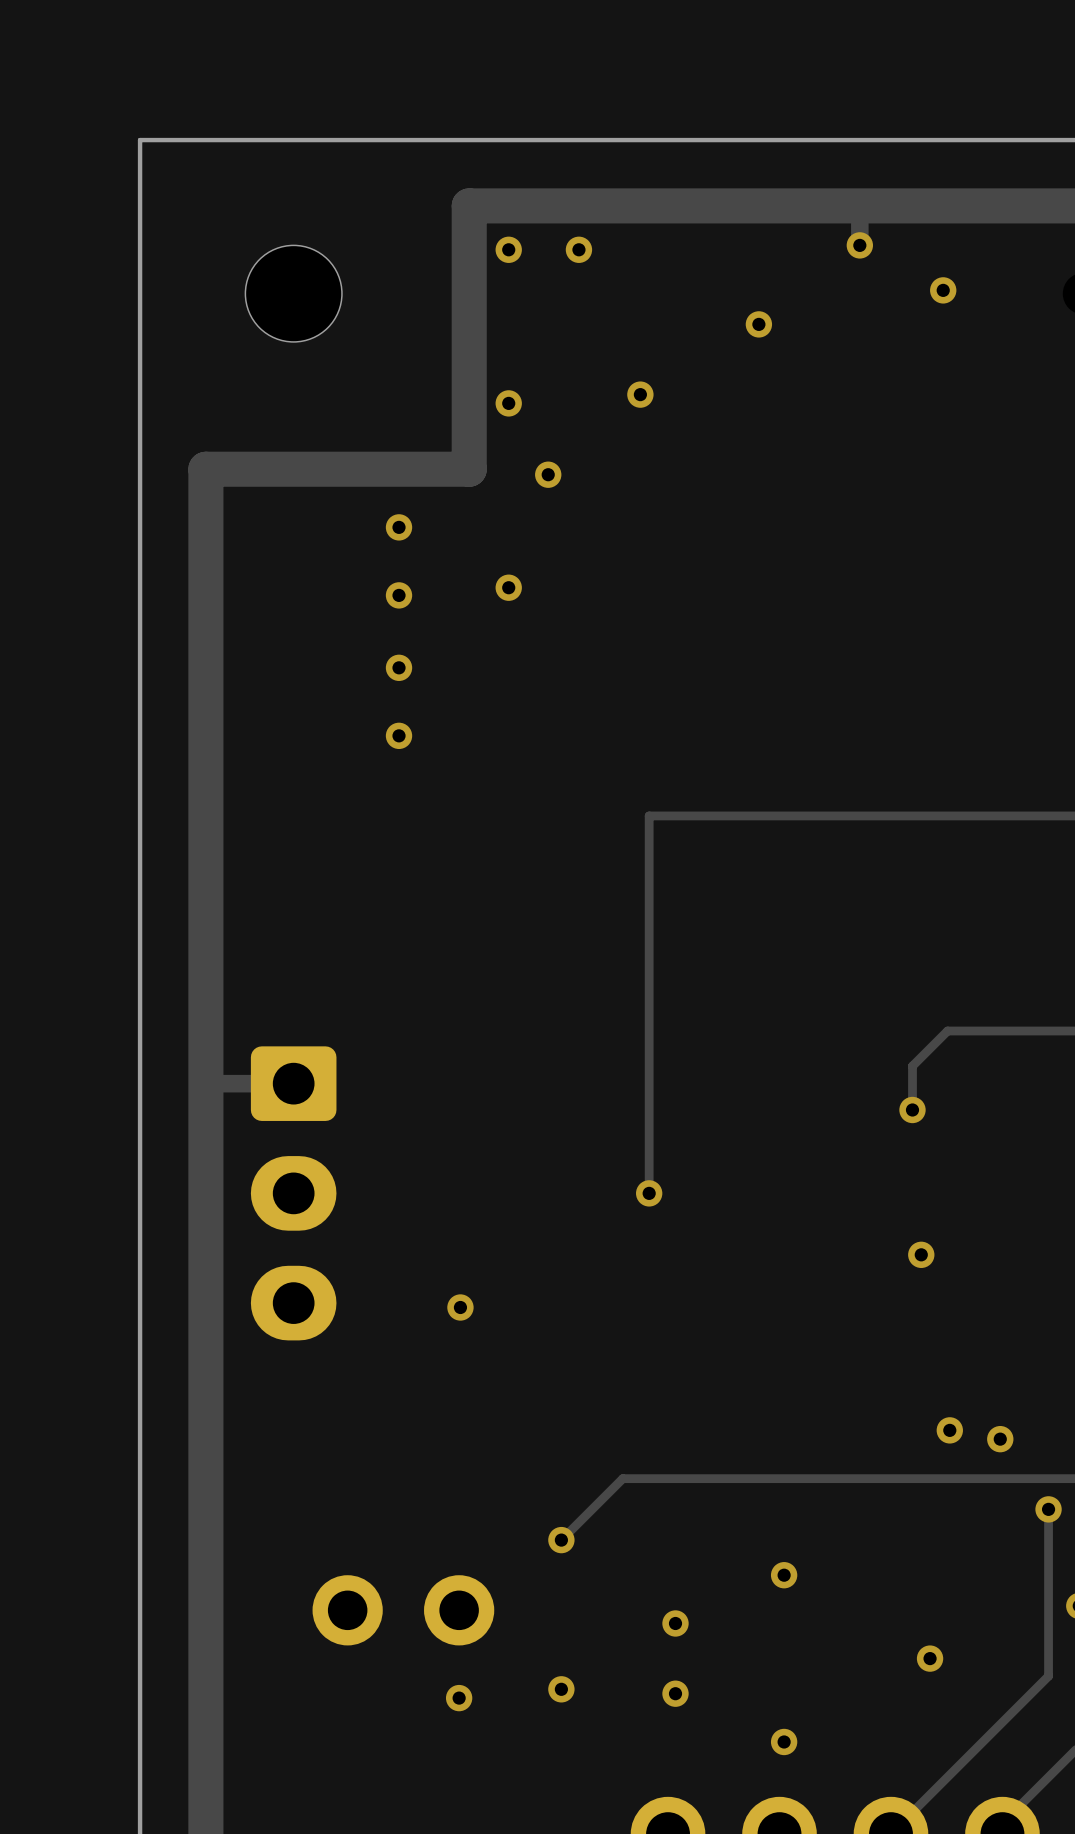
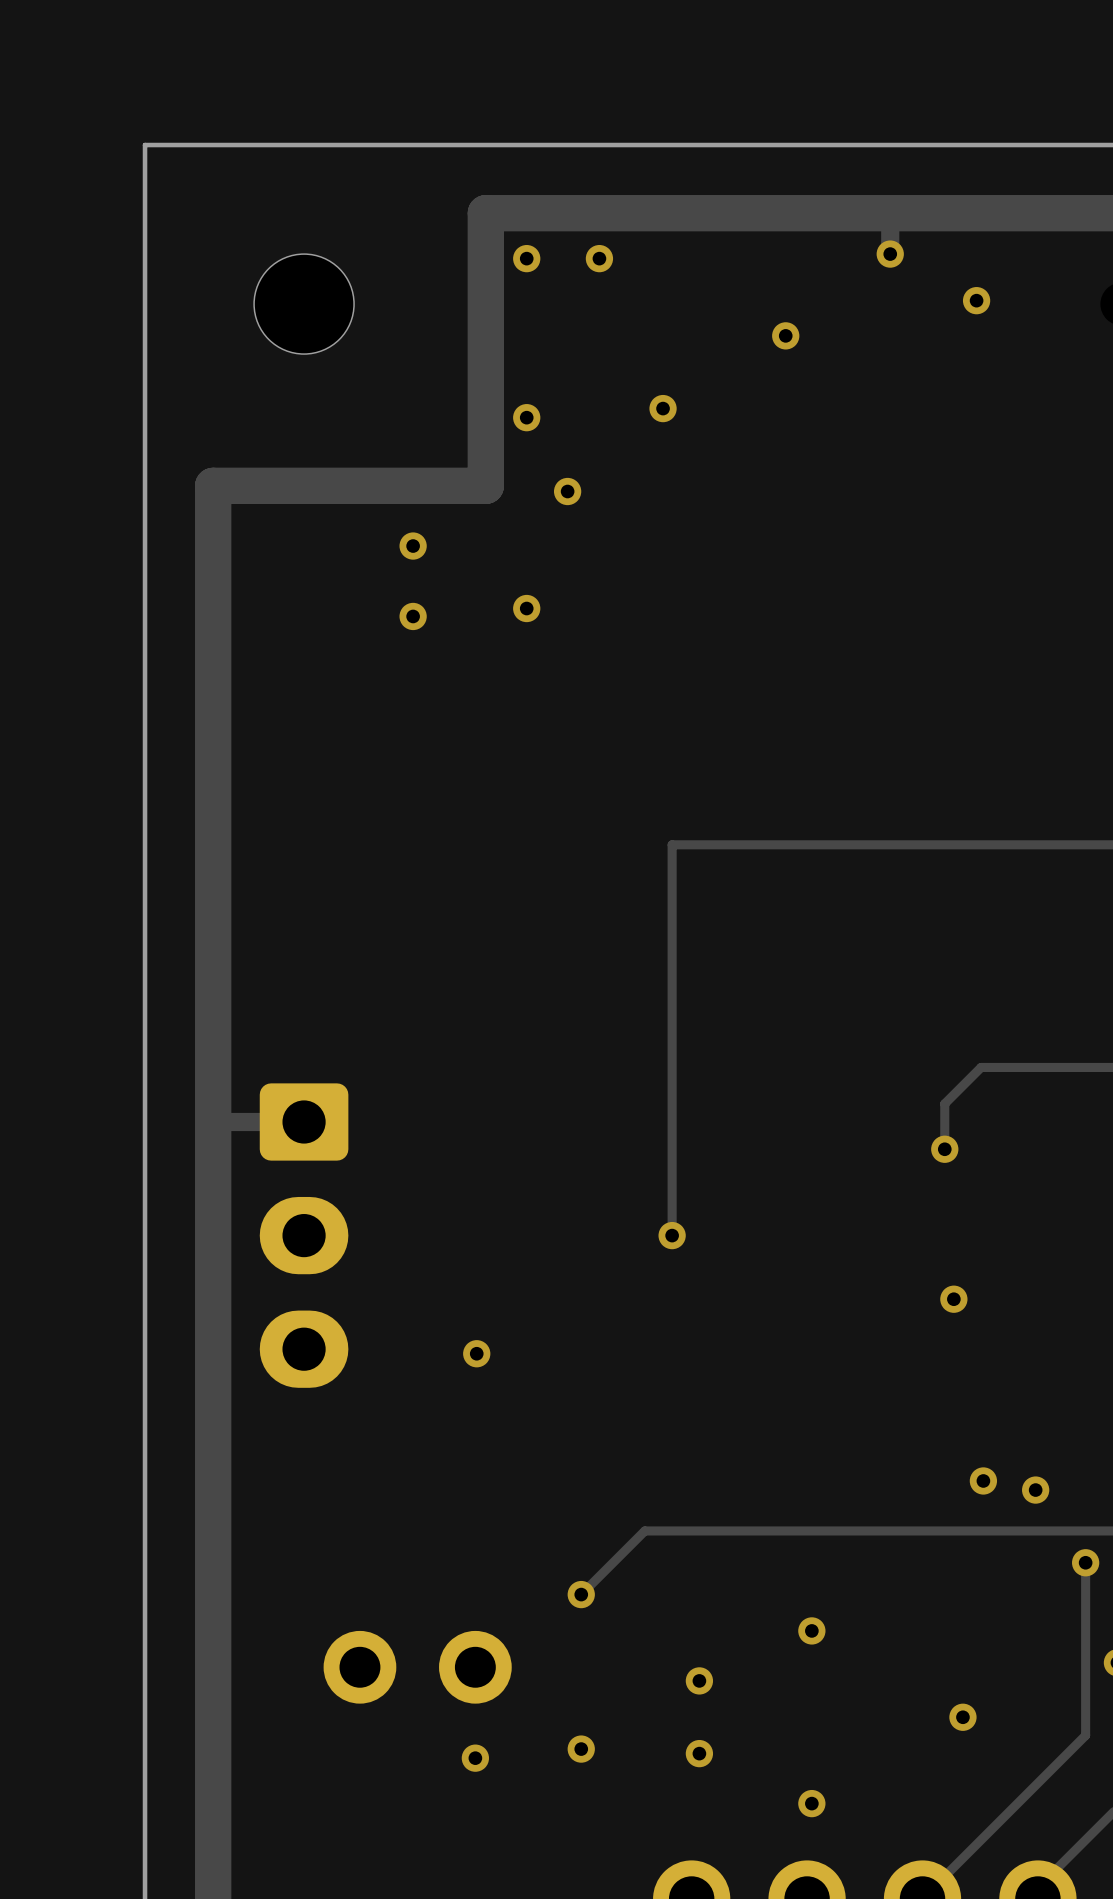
via: (399, 667) -> none
via: (399, 735) -> none

